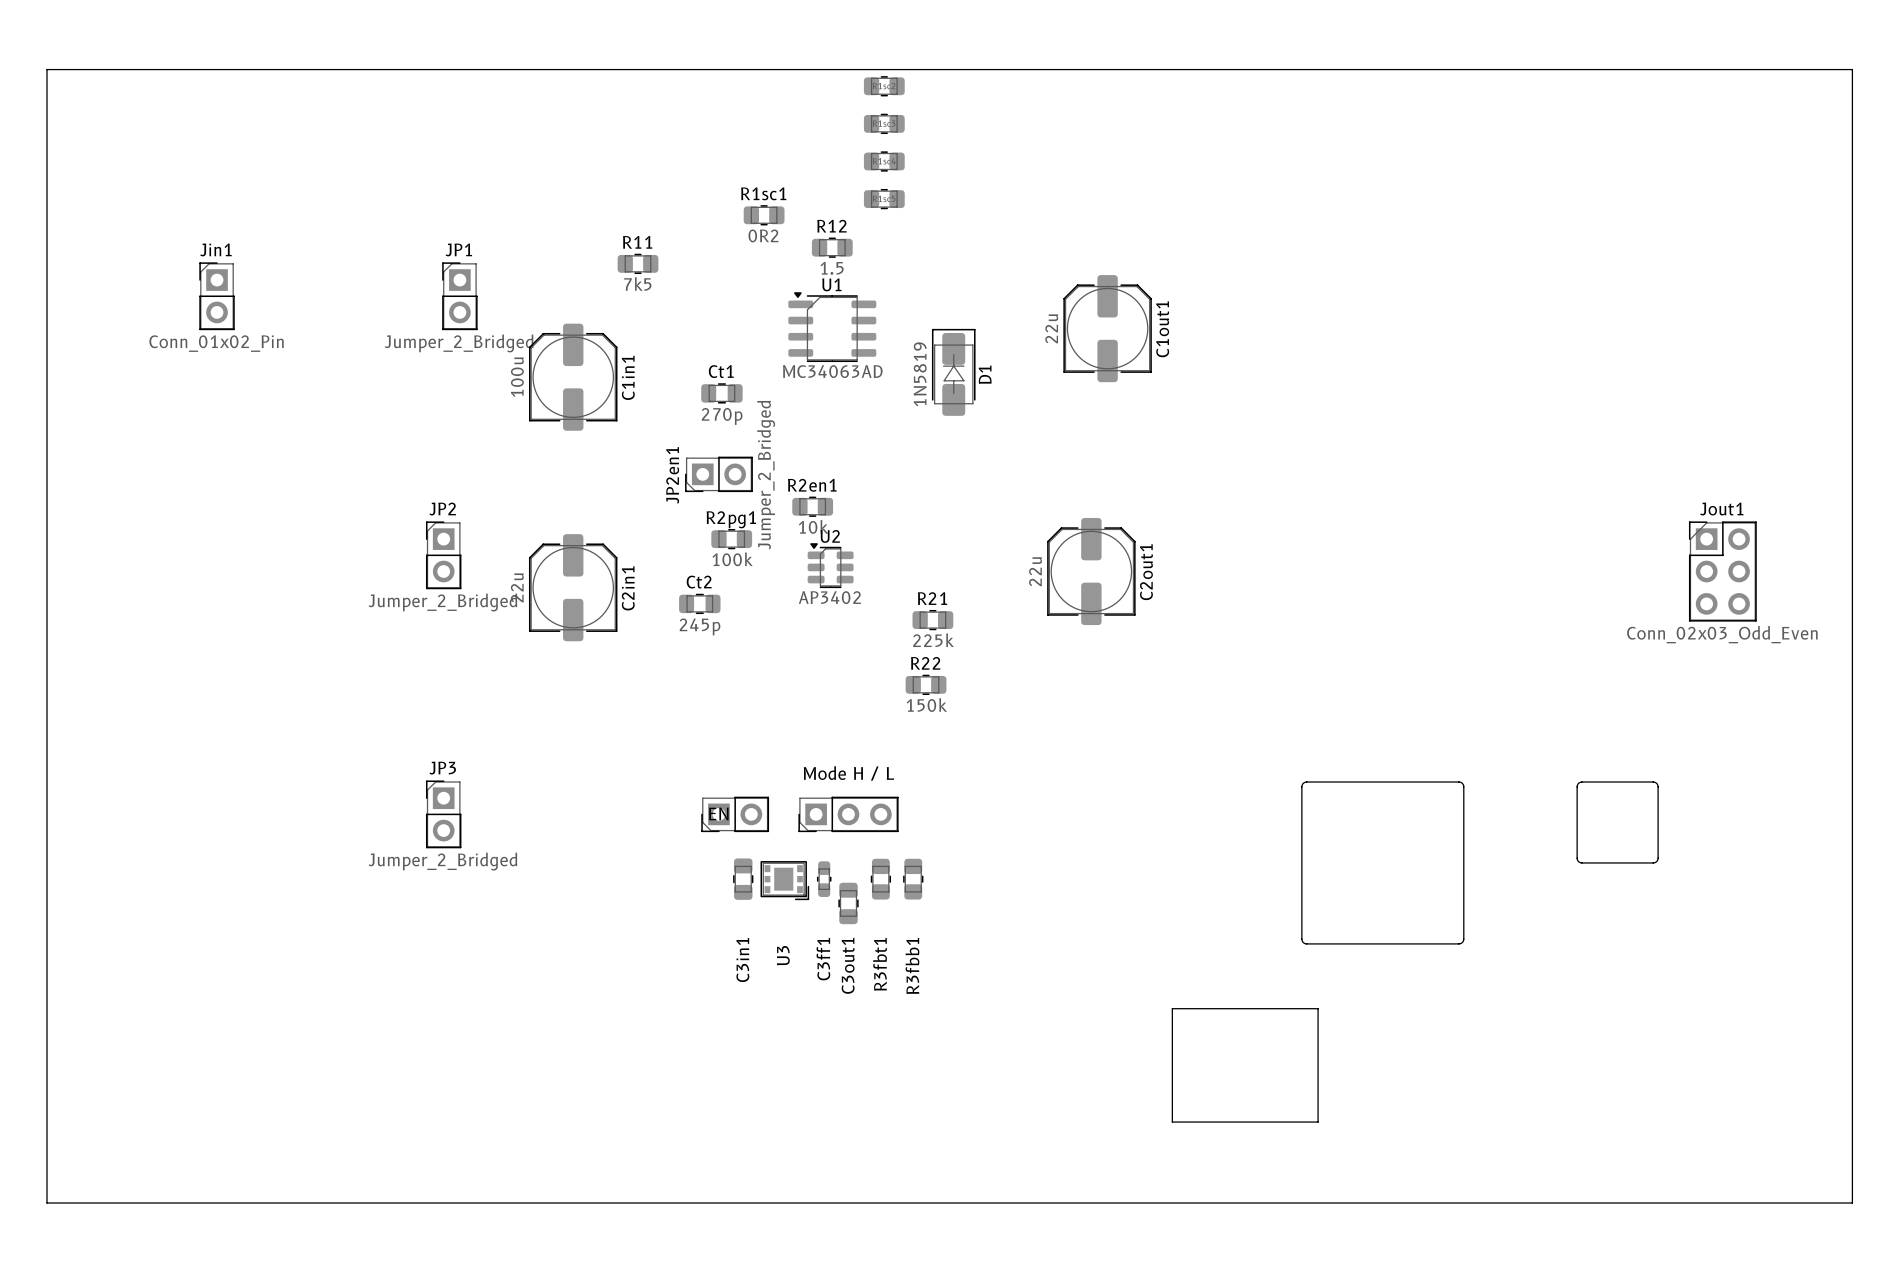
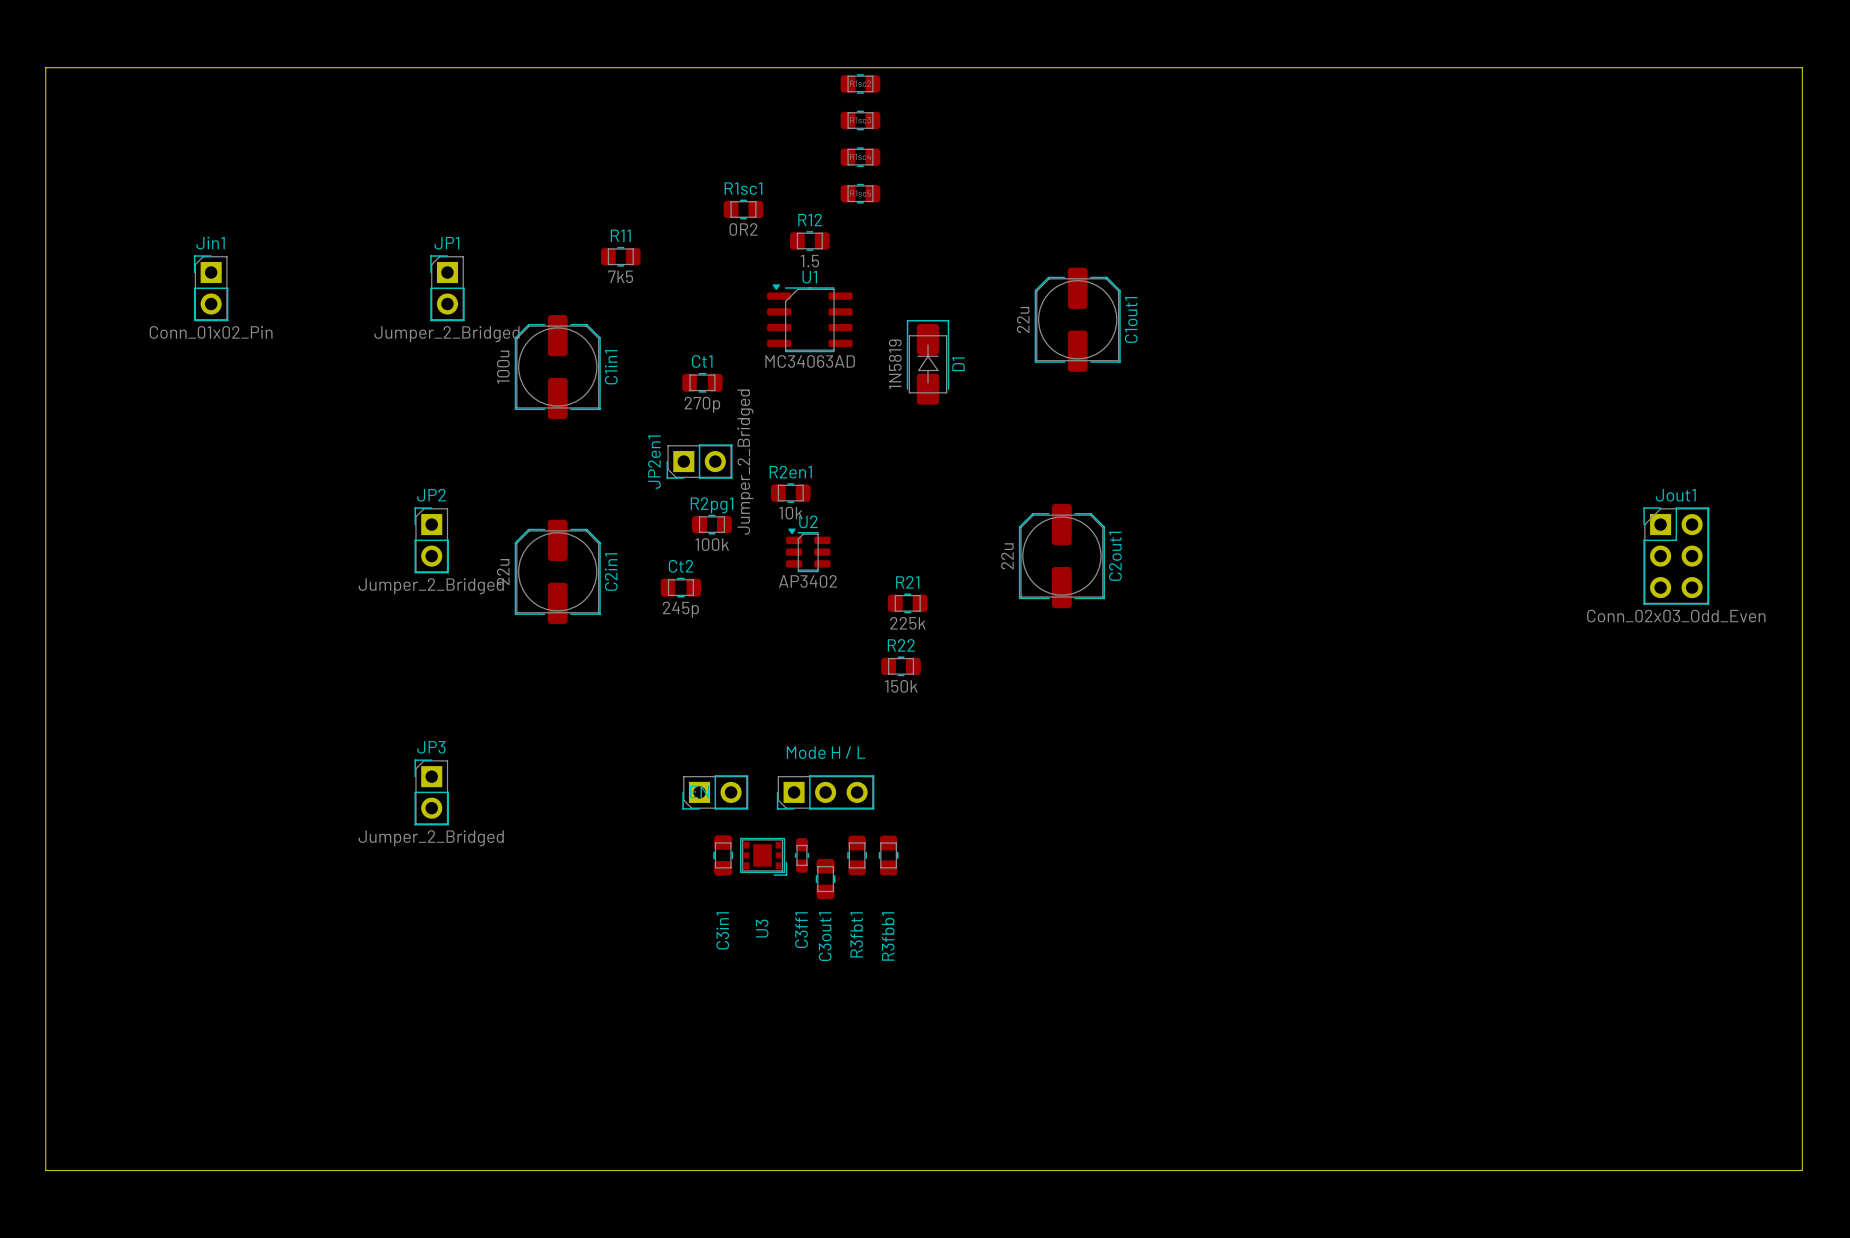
board edge: (1306, 782) (1462, 783) (1462, 942) (1303, 942) (1301, 786) (1306, 782) -> none
board edge: (1581, 782) (1656, 783) (1656, 861) (1578, 861) (1577, 786) (1581, 782) -> none
board edge: (1172, 1008) (1318, 1008) (1318, 1122) (1172, 1122) (1172, 1008) -> none

